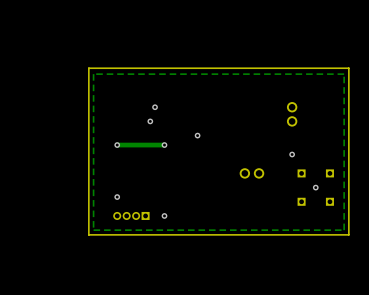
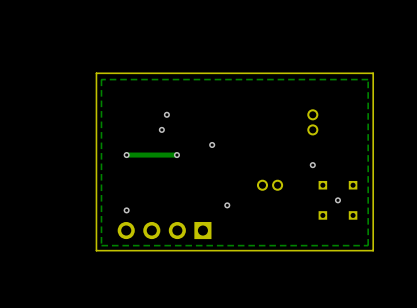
part: (131, 215) -> none
part: none -> (164, 230)
via position: (164, 215) -> (227, 205)

